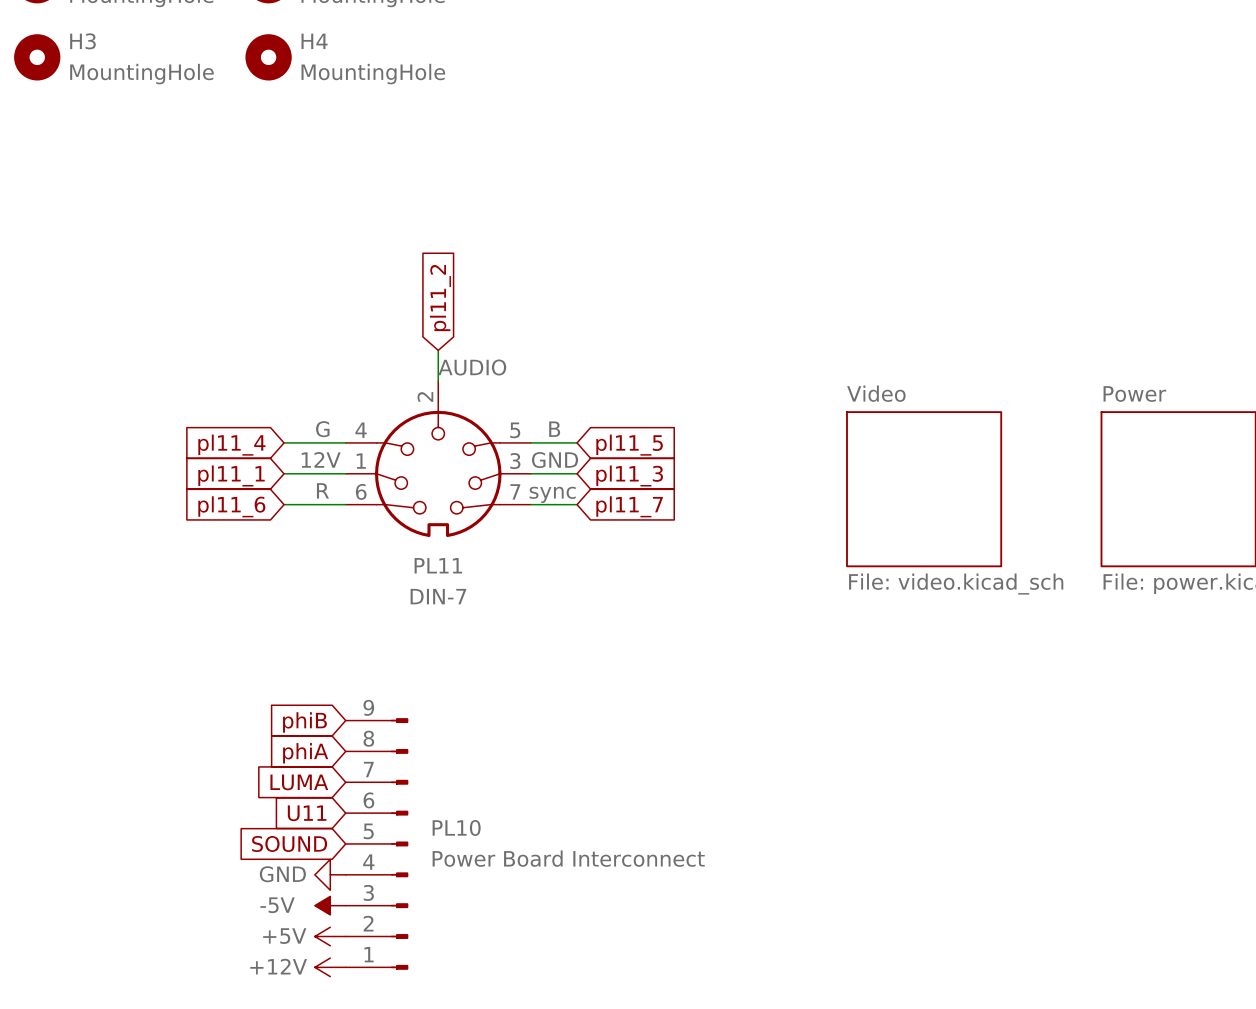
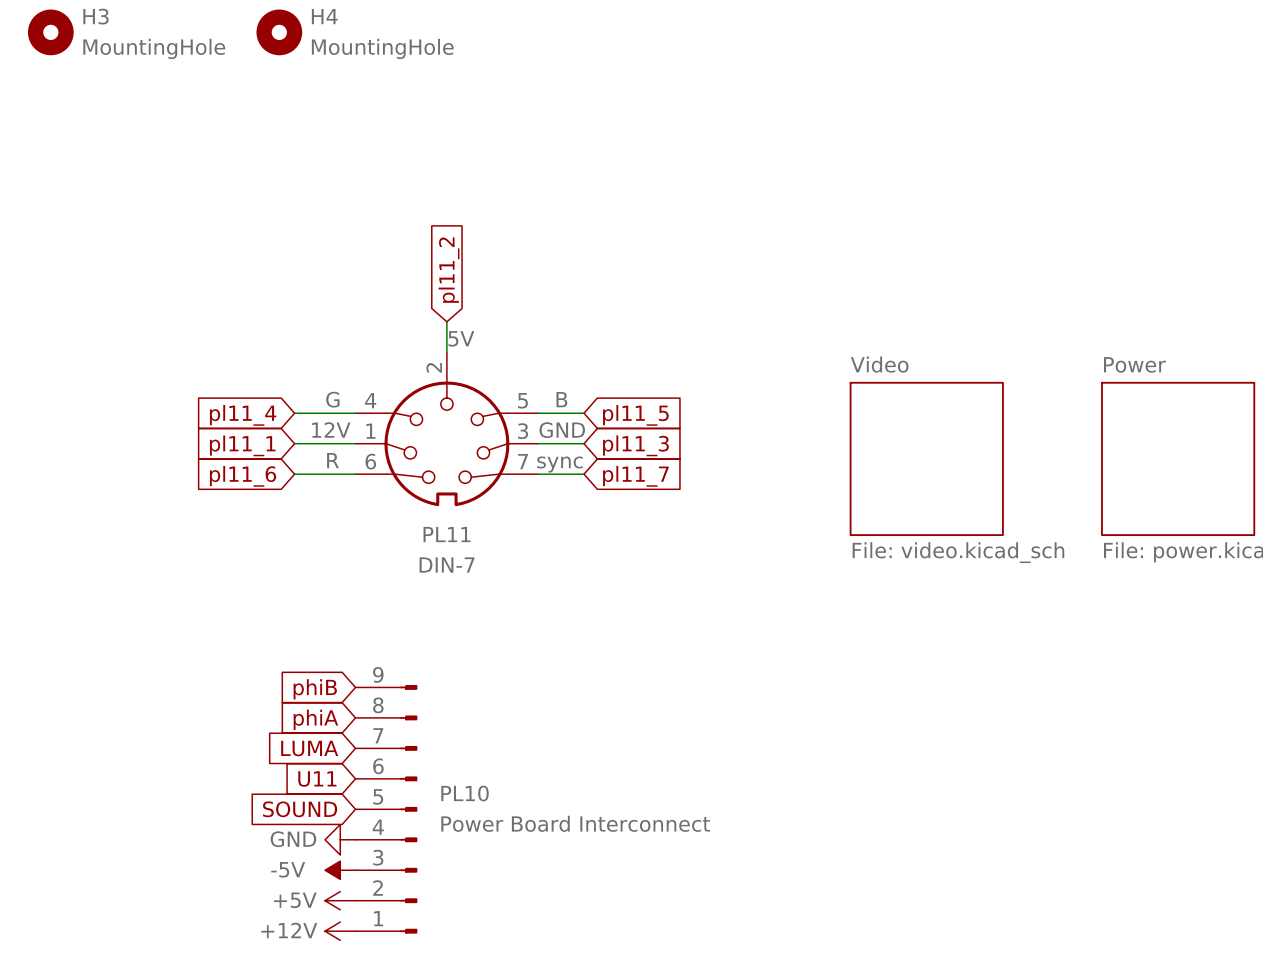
label: AUDIO (472, 367) -> 5V (461, 338)

